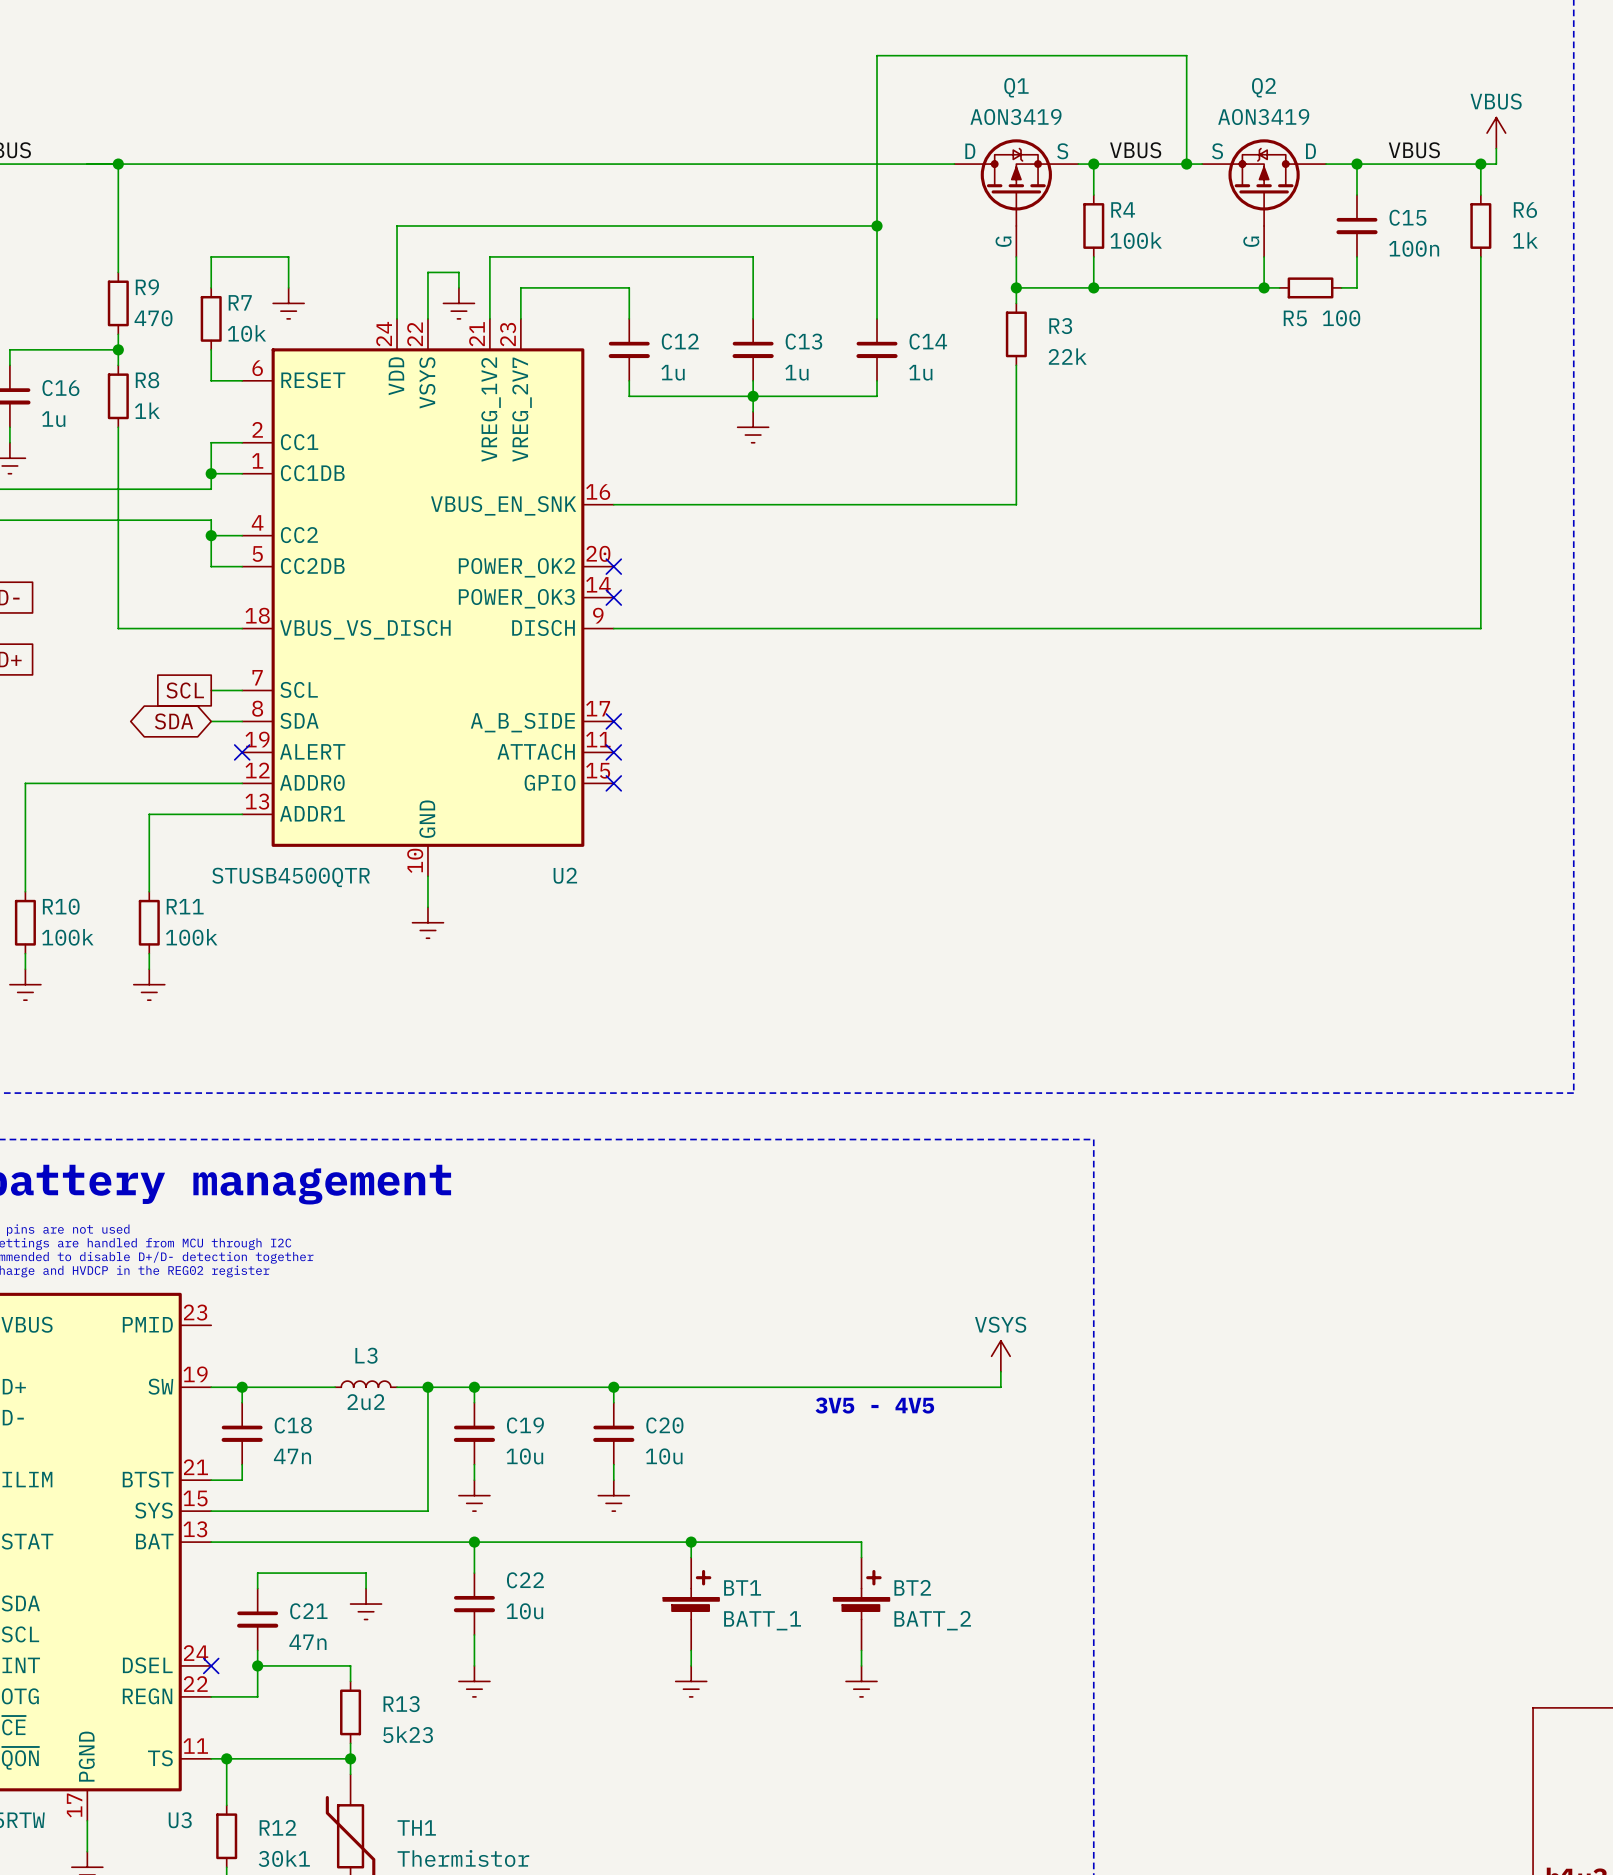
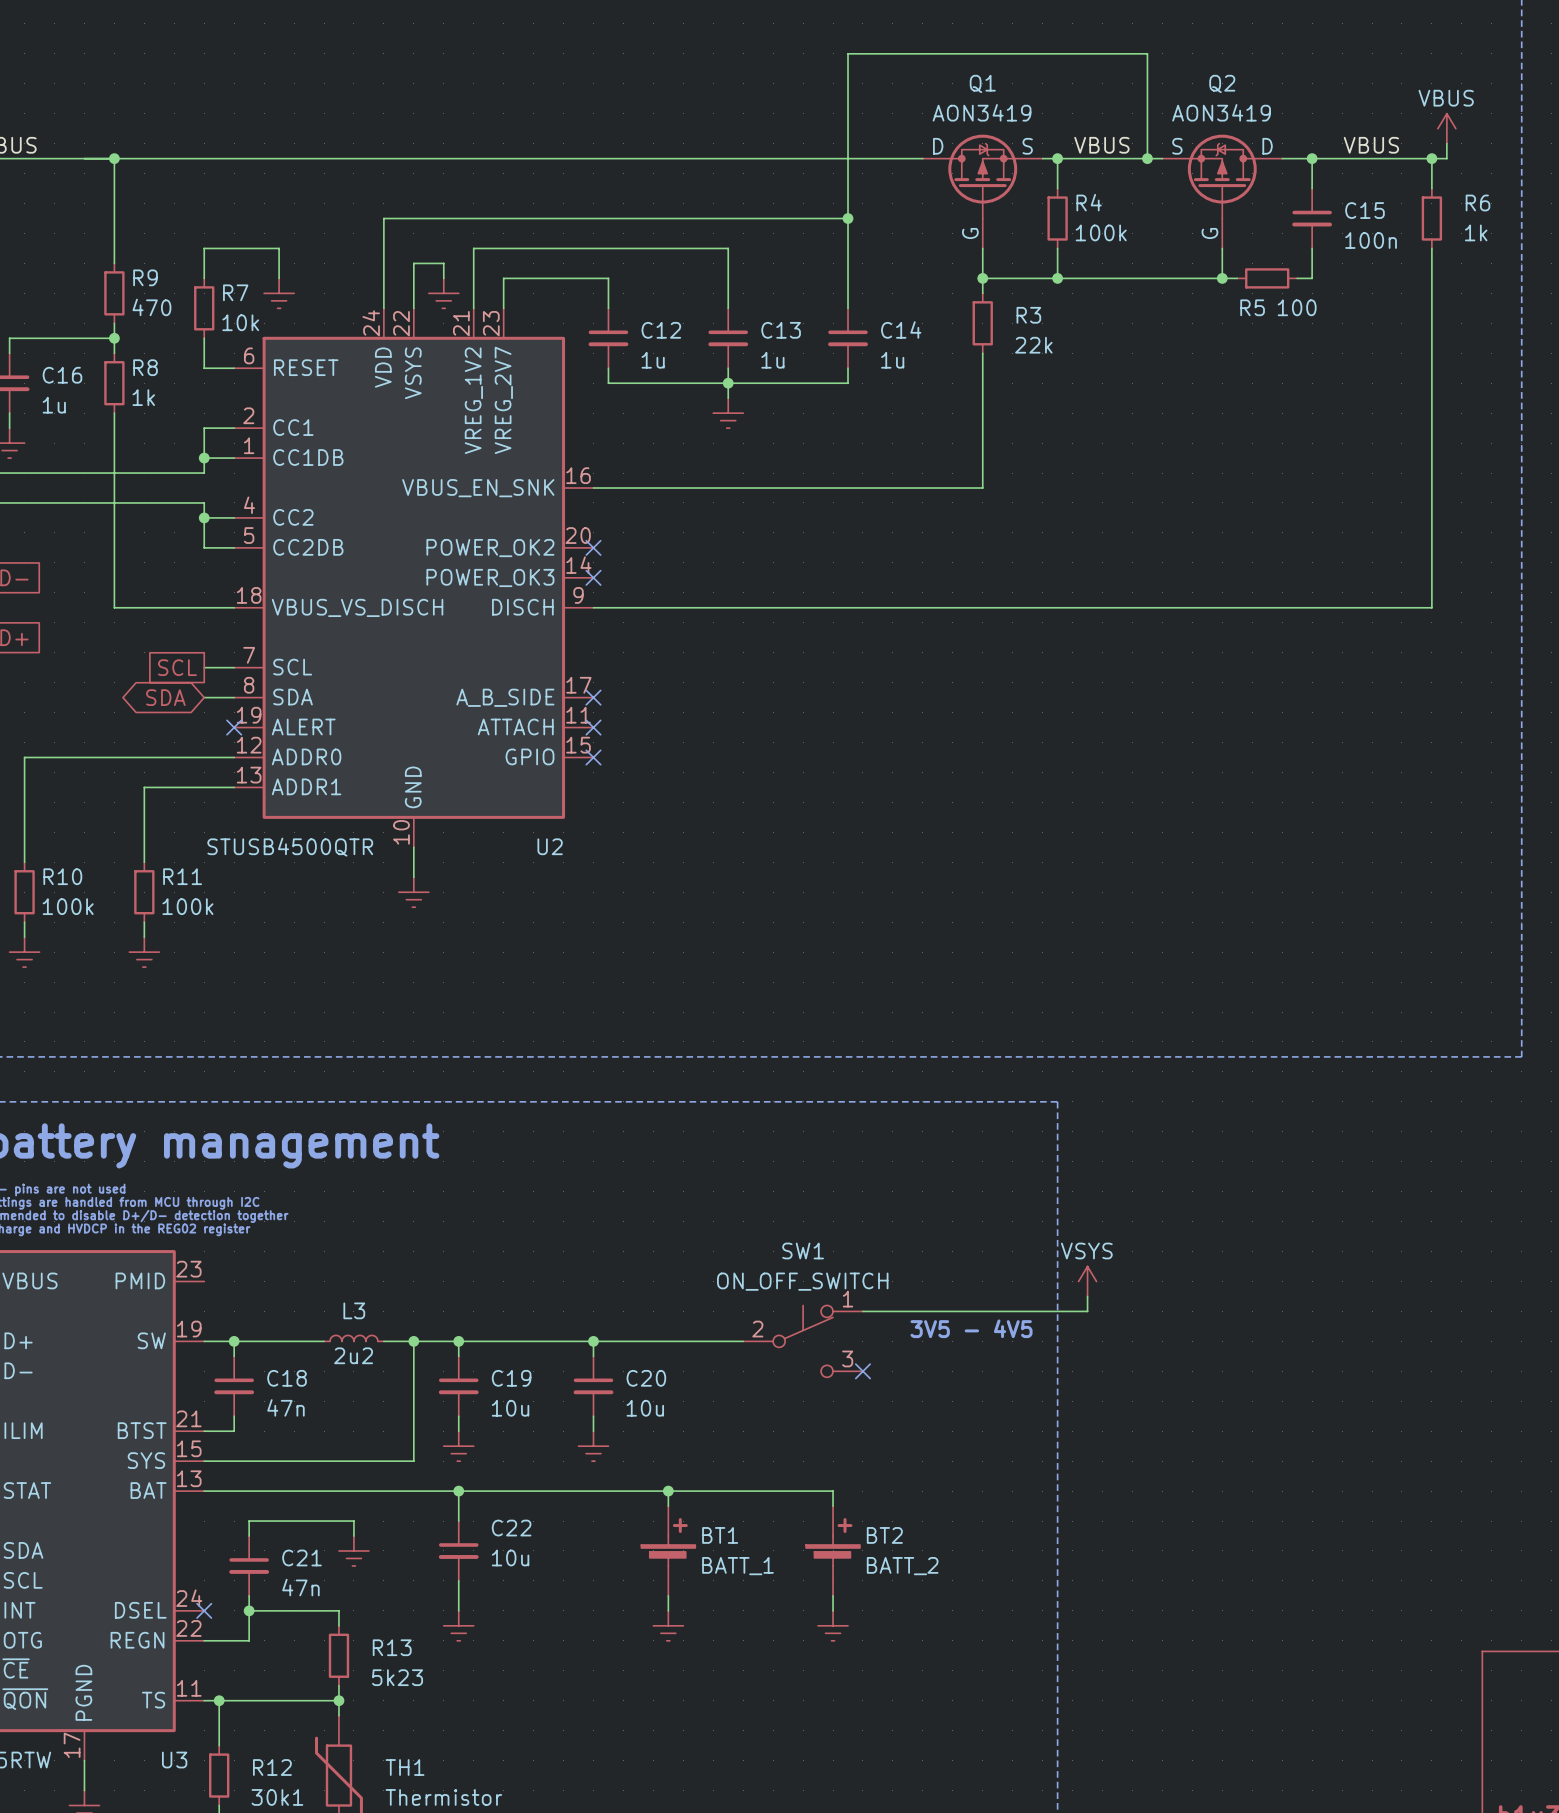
power symbol position: VSYS (1000, 1356) -> VSYS (1087, 1281)
wire: (1000, 1371) (1000, 1387) (768, 1387) -> (1087, 1296) (1087, 1311) (862, 1311)
SW1: none -> ON_OFF_SWITCH (803, 1341)
text position: 3V5 - 4V5 (874, 1405) -> 3V5 - 4V5 (971, 1328)
no-connect mark: none -> (862, 1371)

